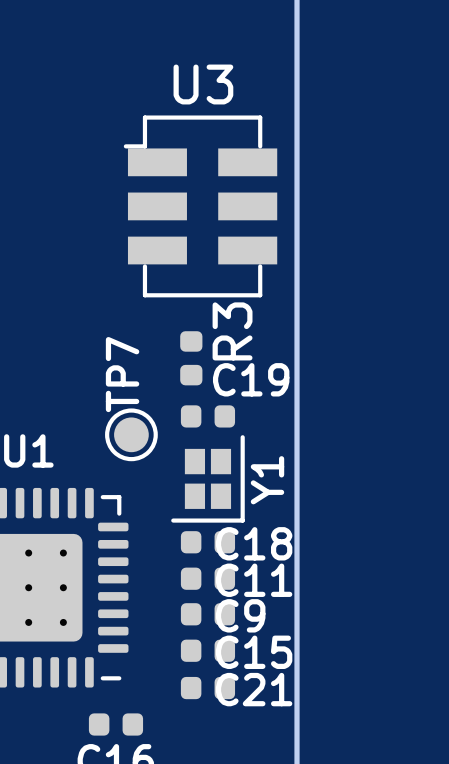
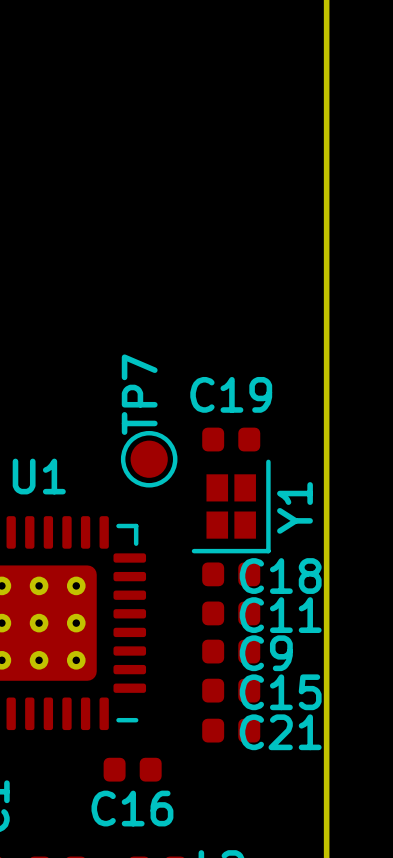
U3: (200, 206) -> none
R3: (191, 358) -> none
C19 name position: C19 (251, 379) -> C19 (231, 394)

